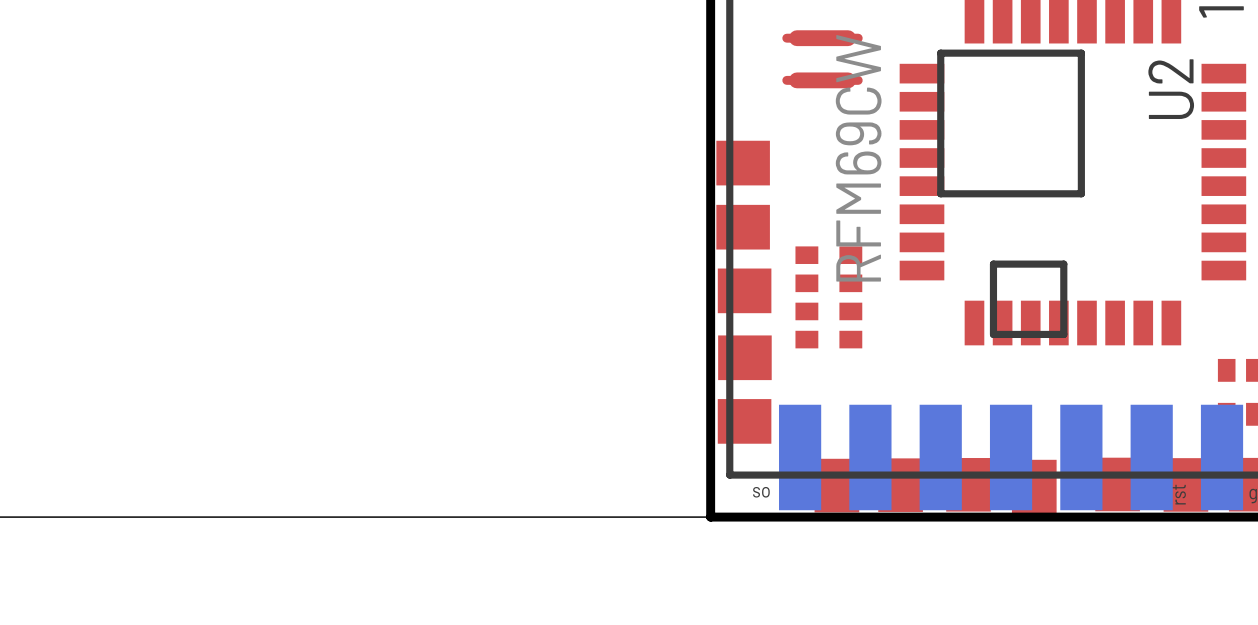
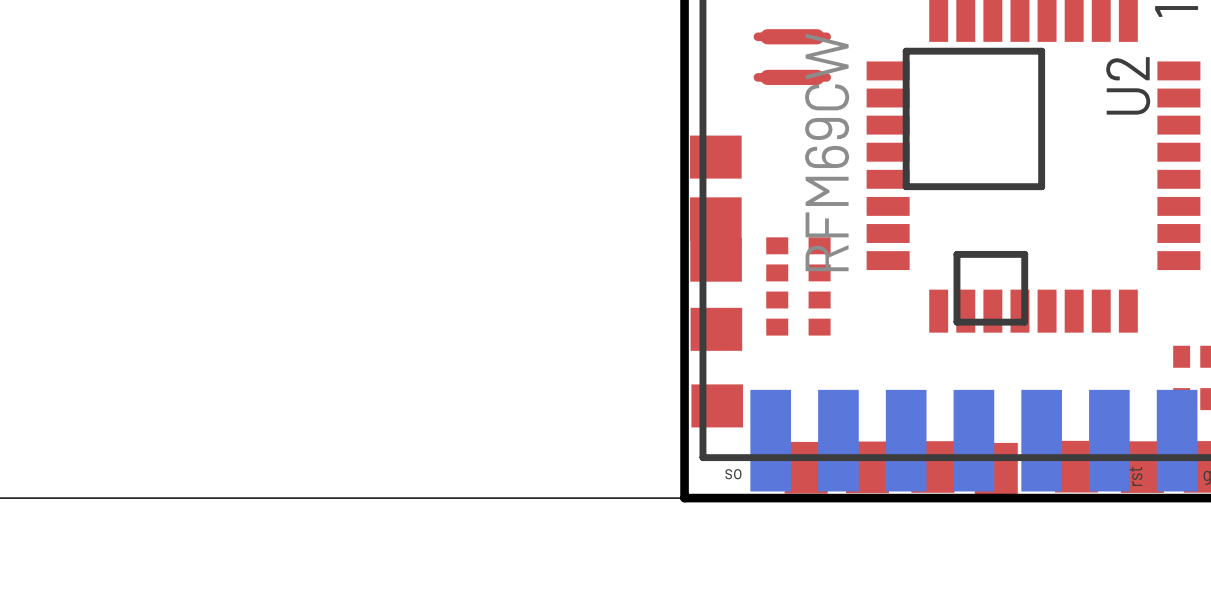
part position: (744, 290) -> (716, 260)
part position: (744, 357) -> (716, 329)

